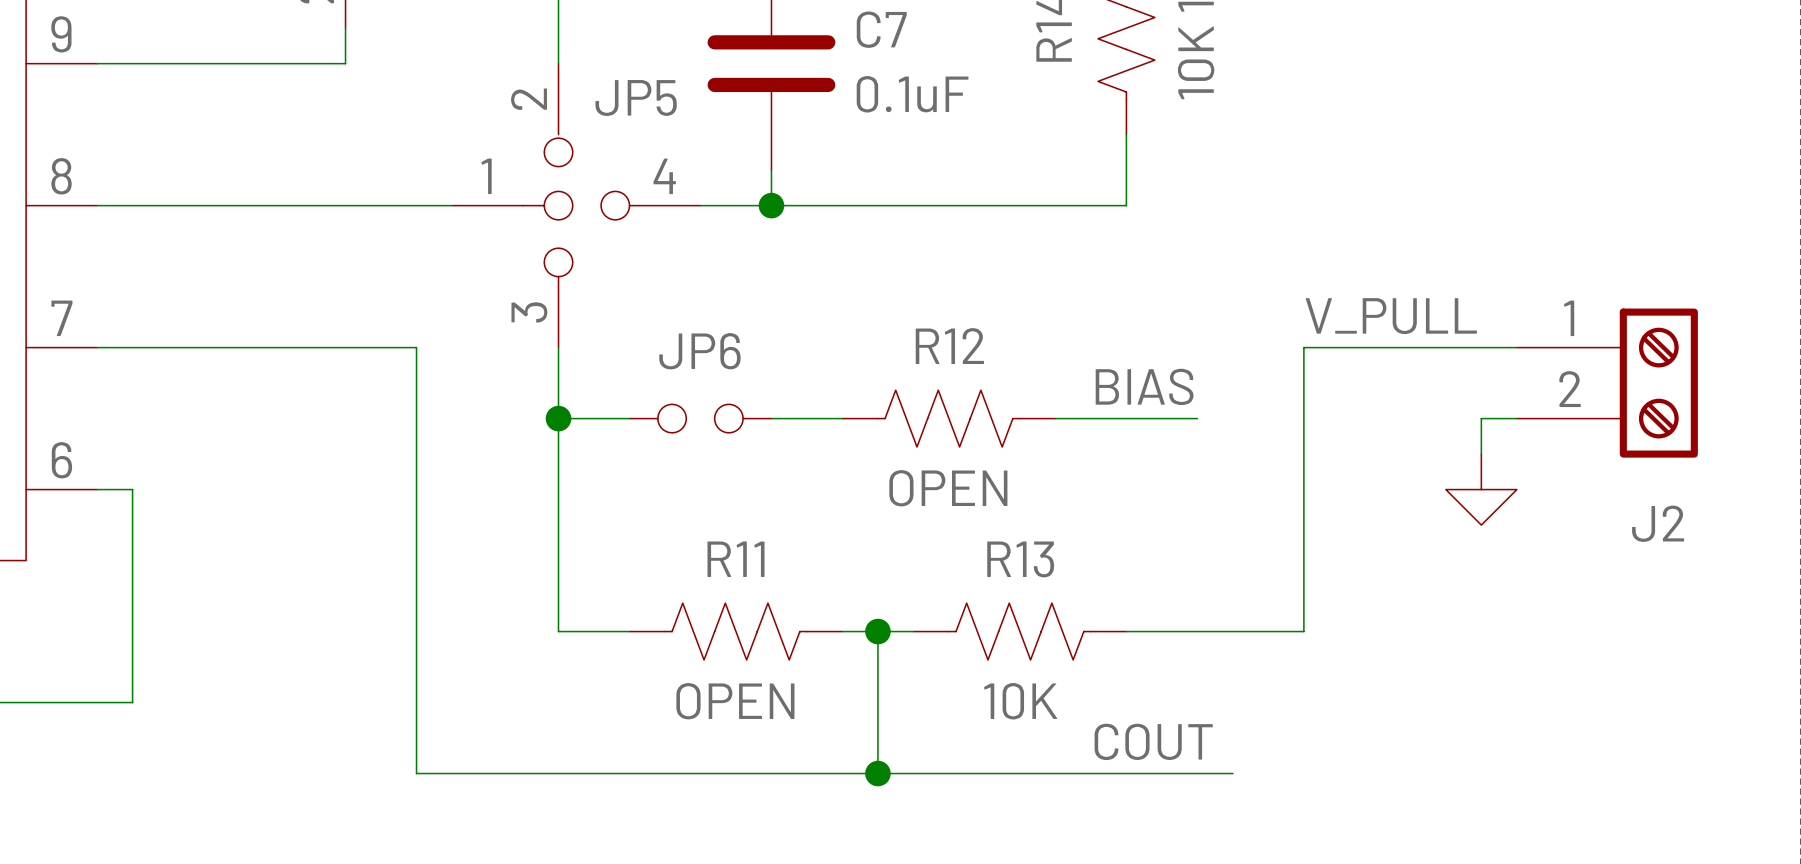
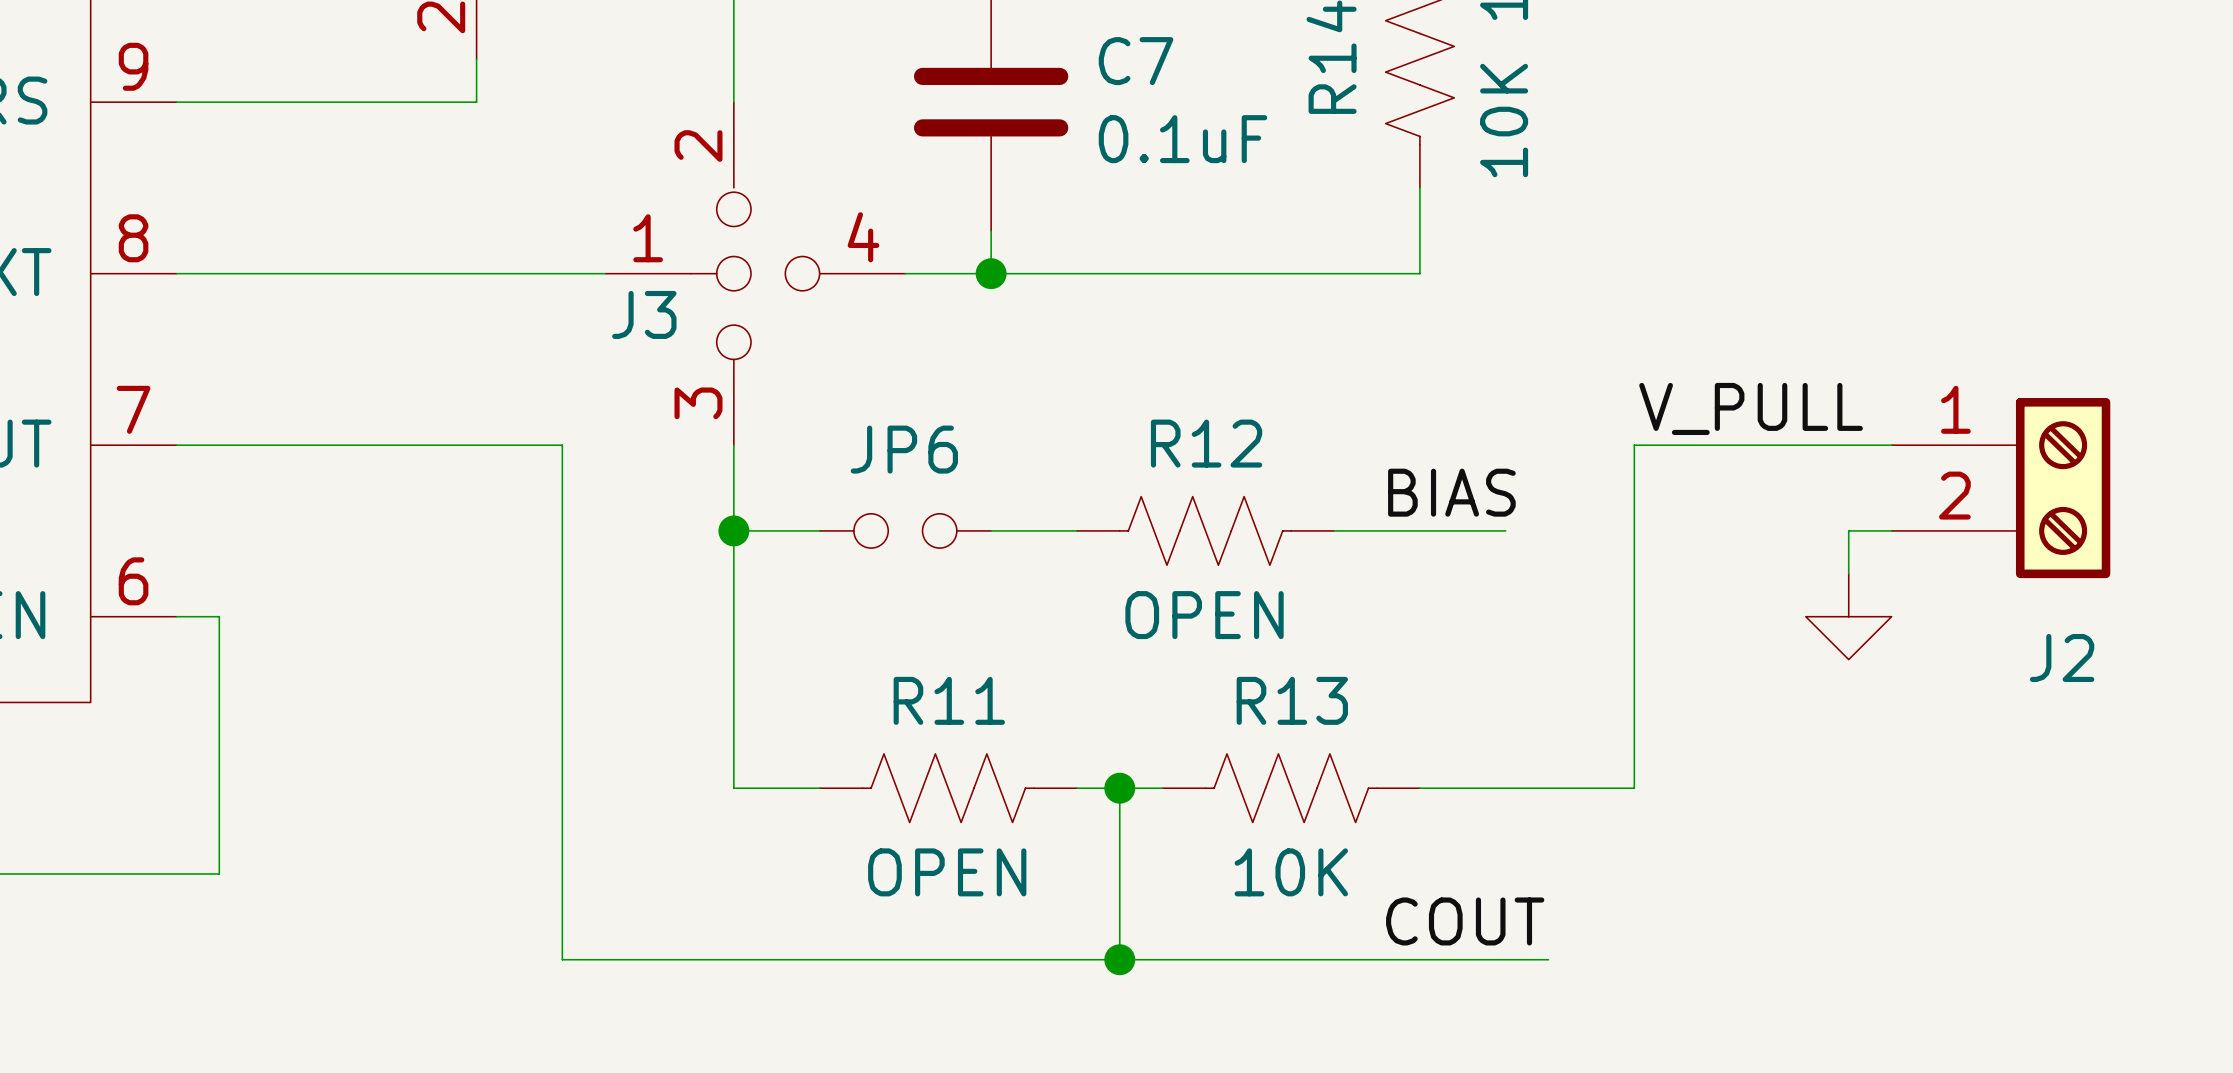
JP5 name: JP5 (636, 97) -> J3 (644, 314)

